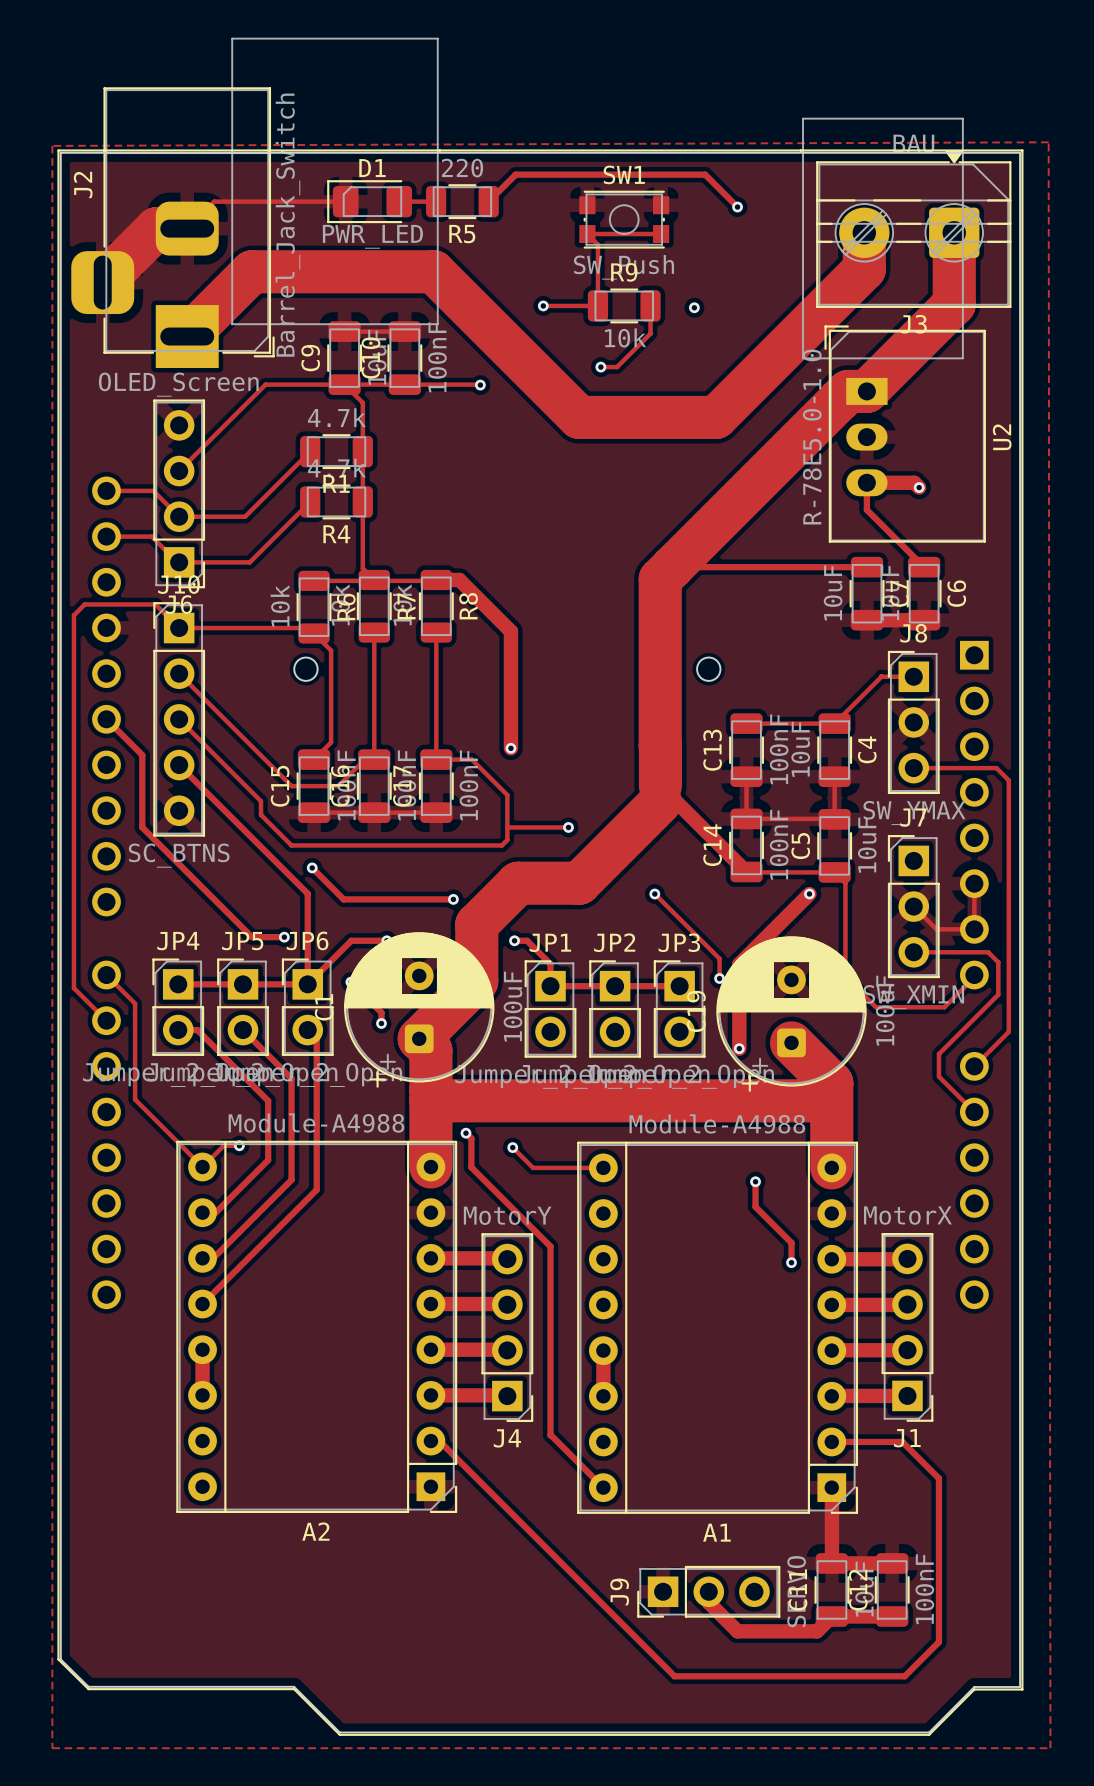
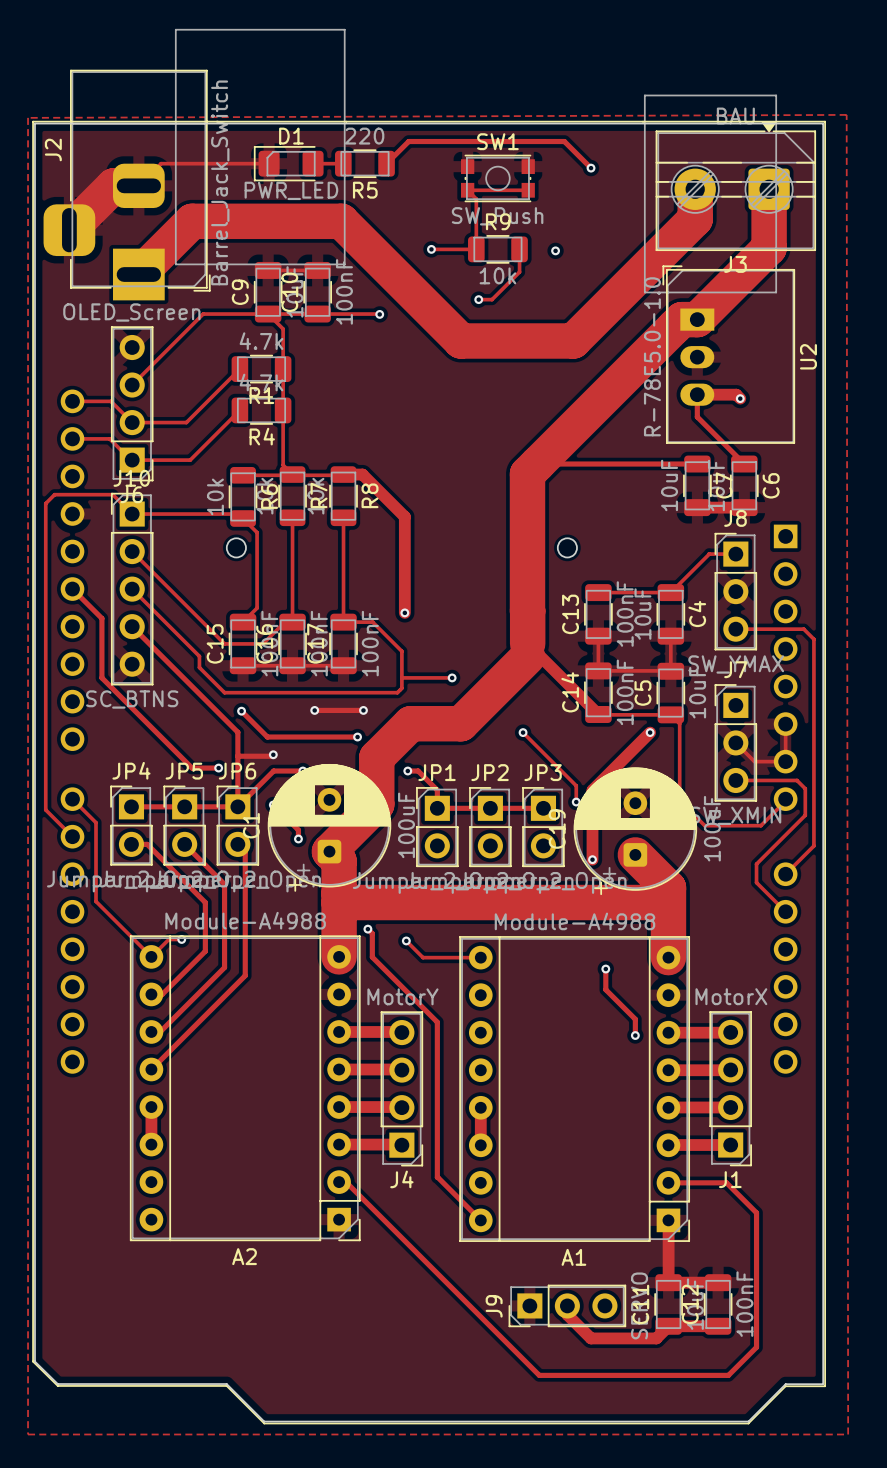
track: none -> (314, 710) (363, 710)
via: none -> (314, 710)
via: none -> (363, 710)
track: none -> (273, 754) (237, 756)
via: none -> (273, 754)

